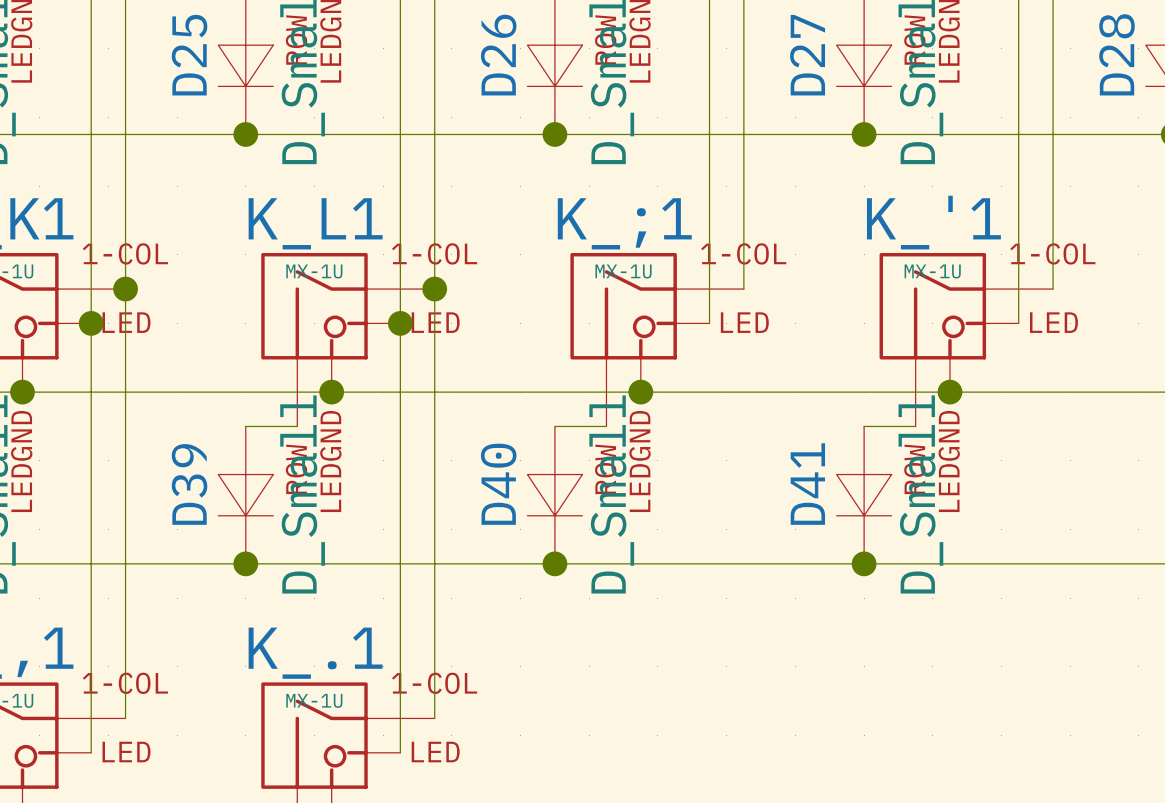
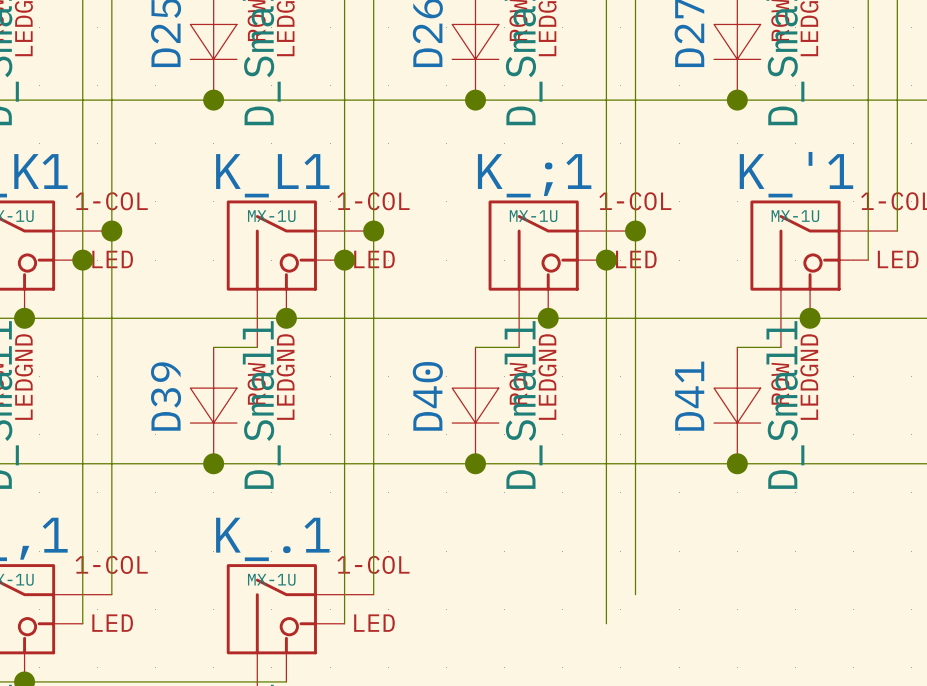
wire: none -> (635, 231) (635, 594)
junction: none -> (635, 231)
wire: none -> (606, 260) (606, 623)
junction: none -> (606, 260)

